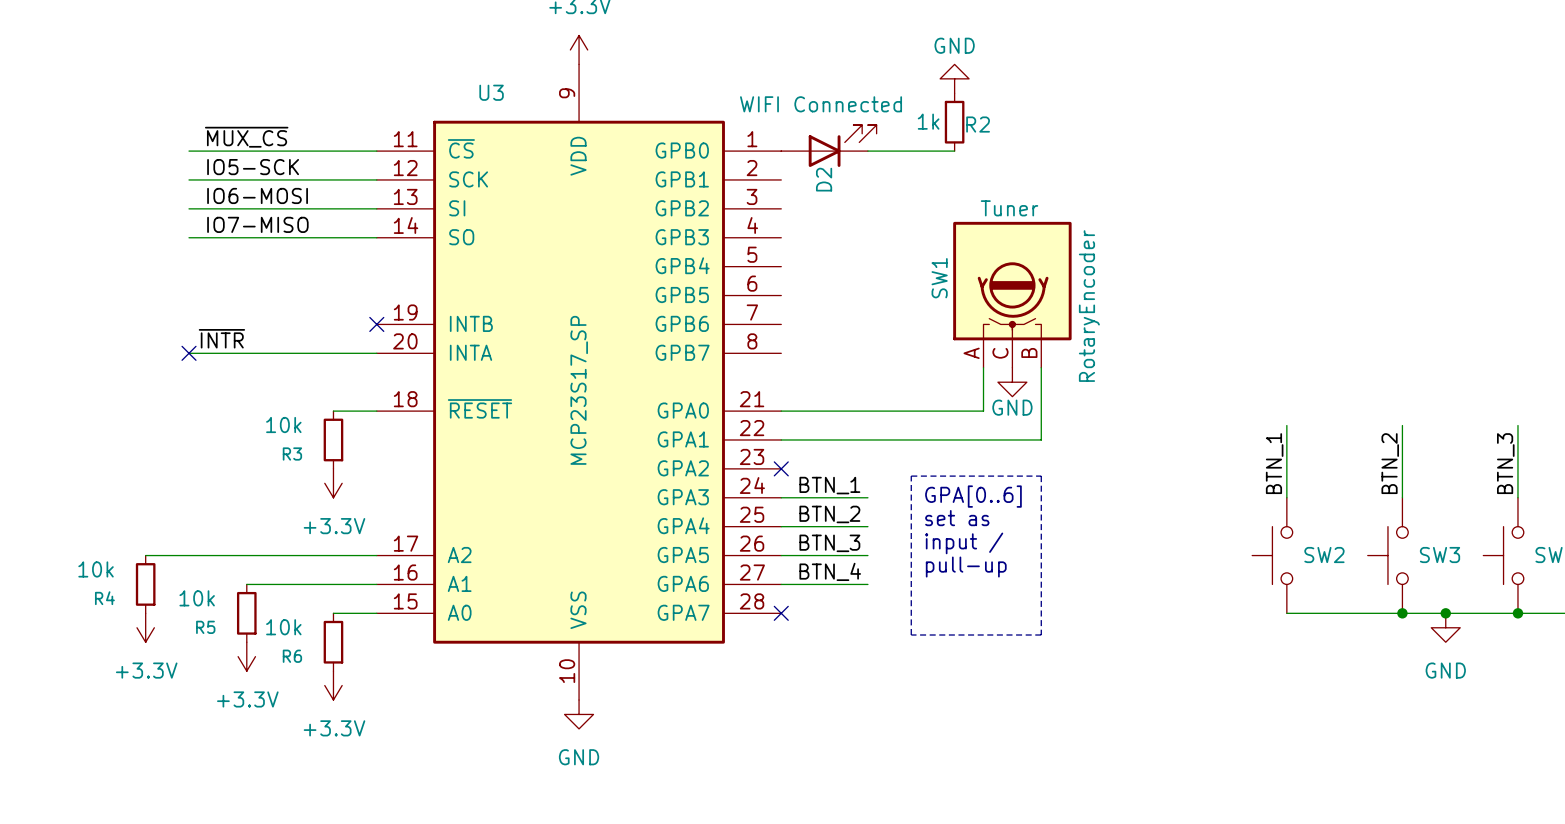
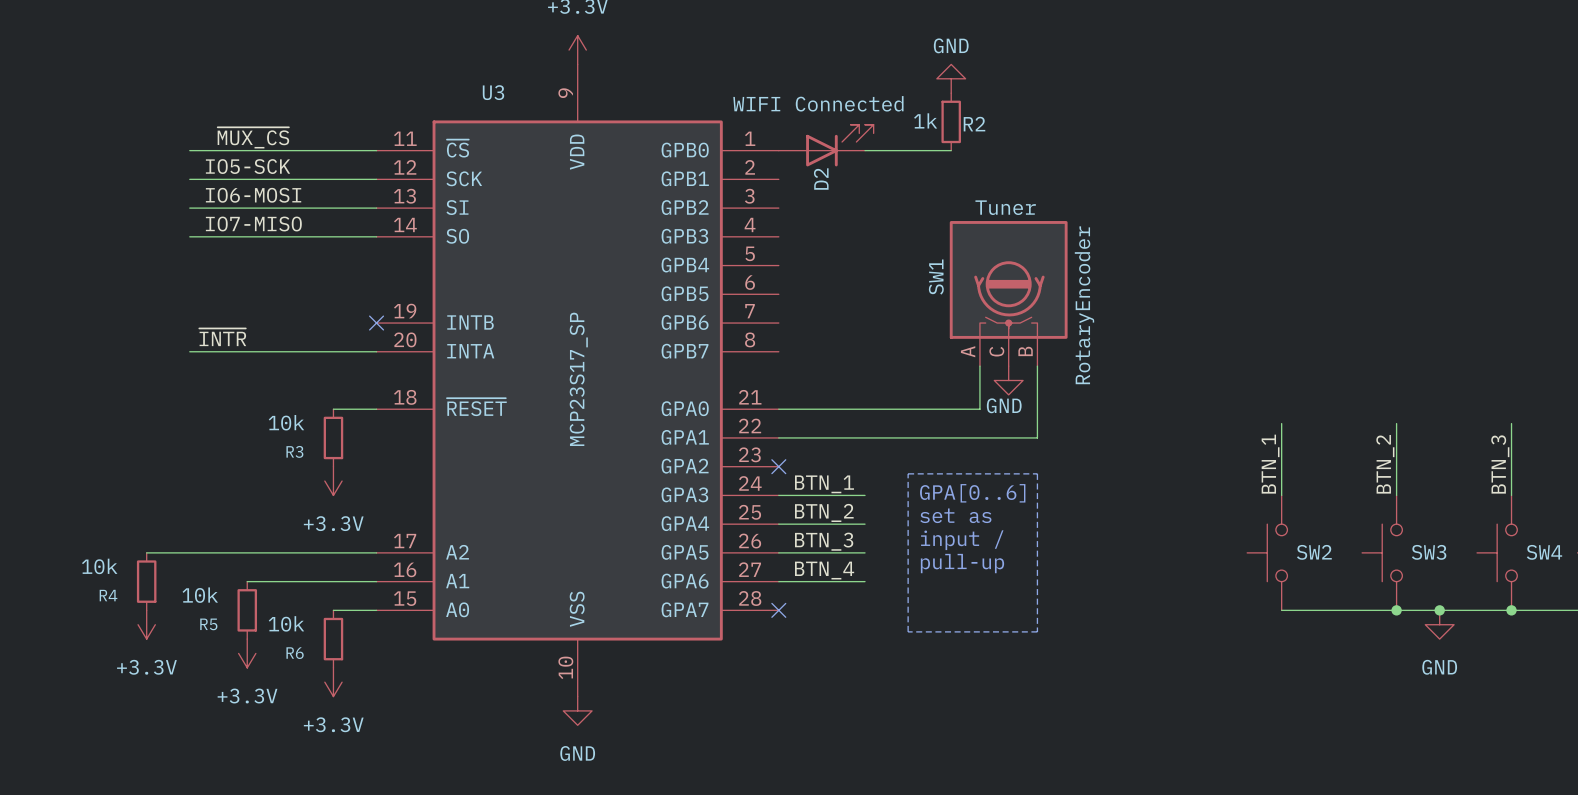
no-connect mark: (189, 353) -> none

